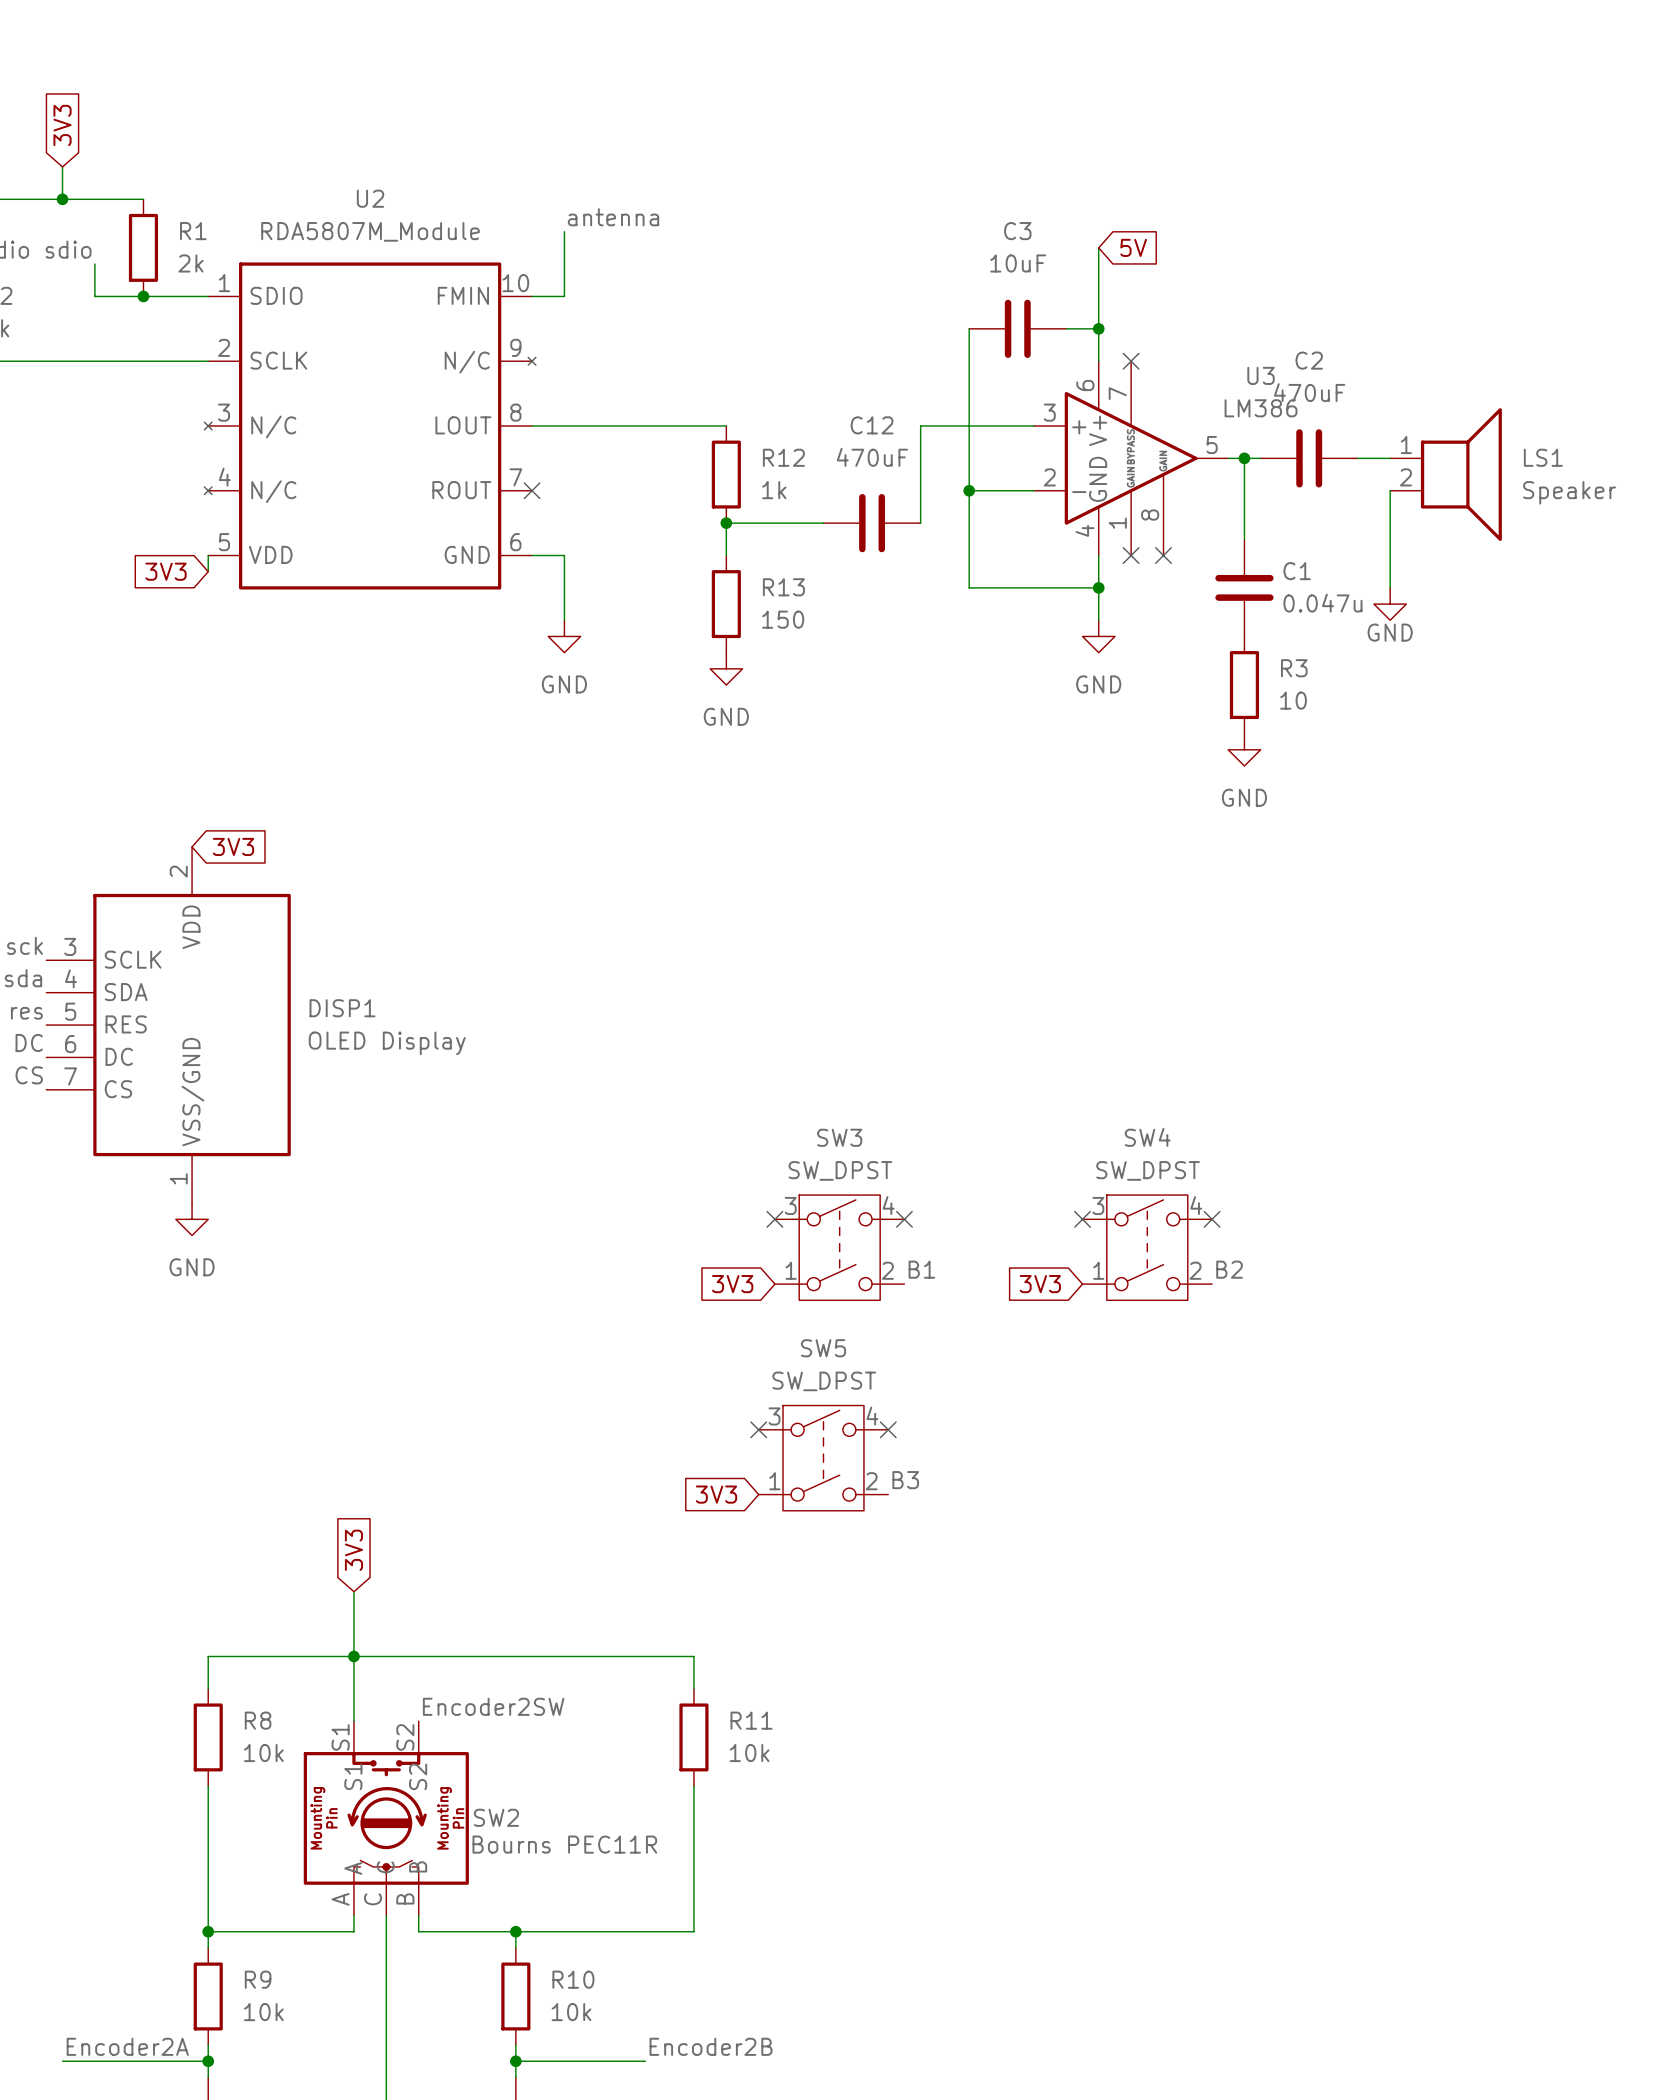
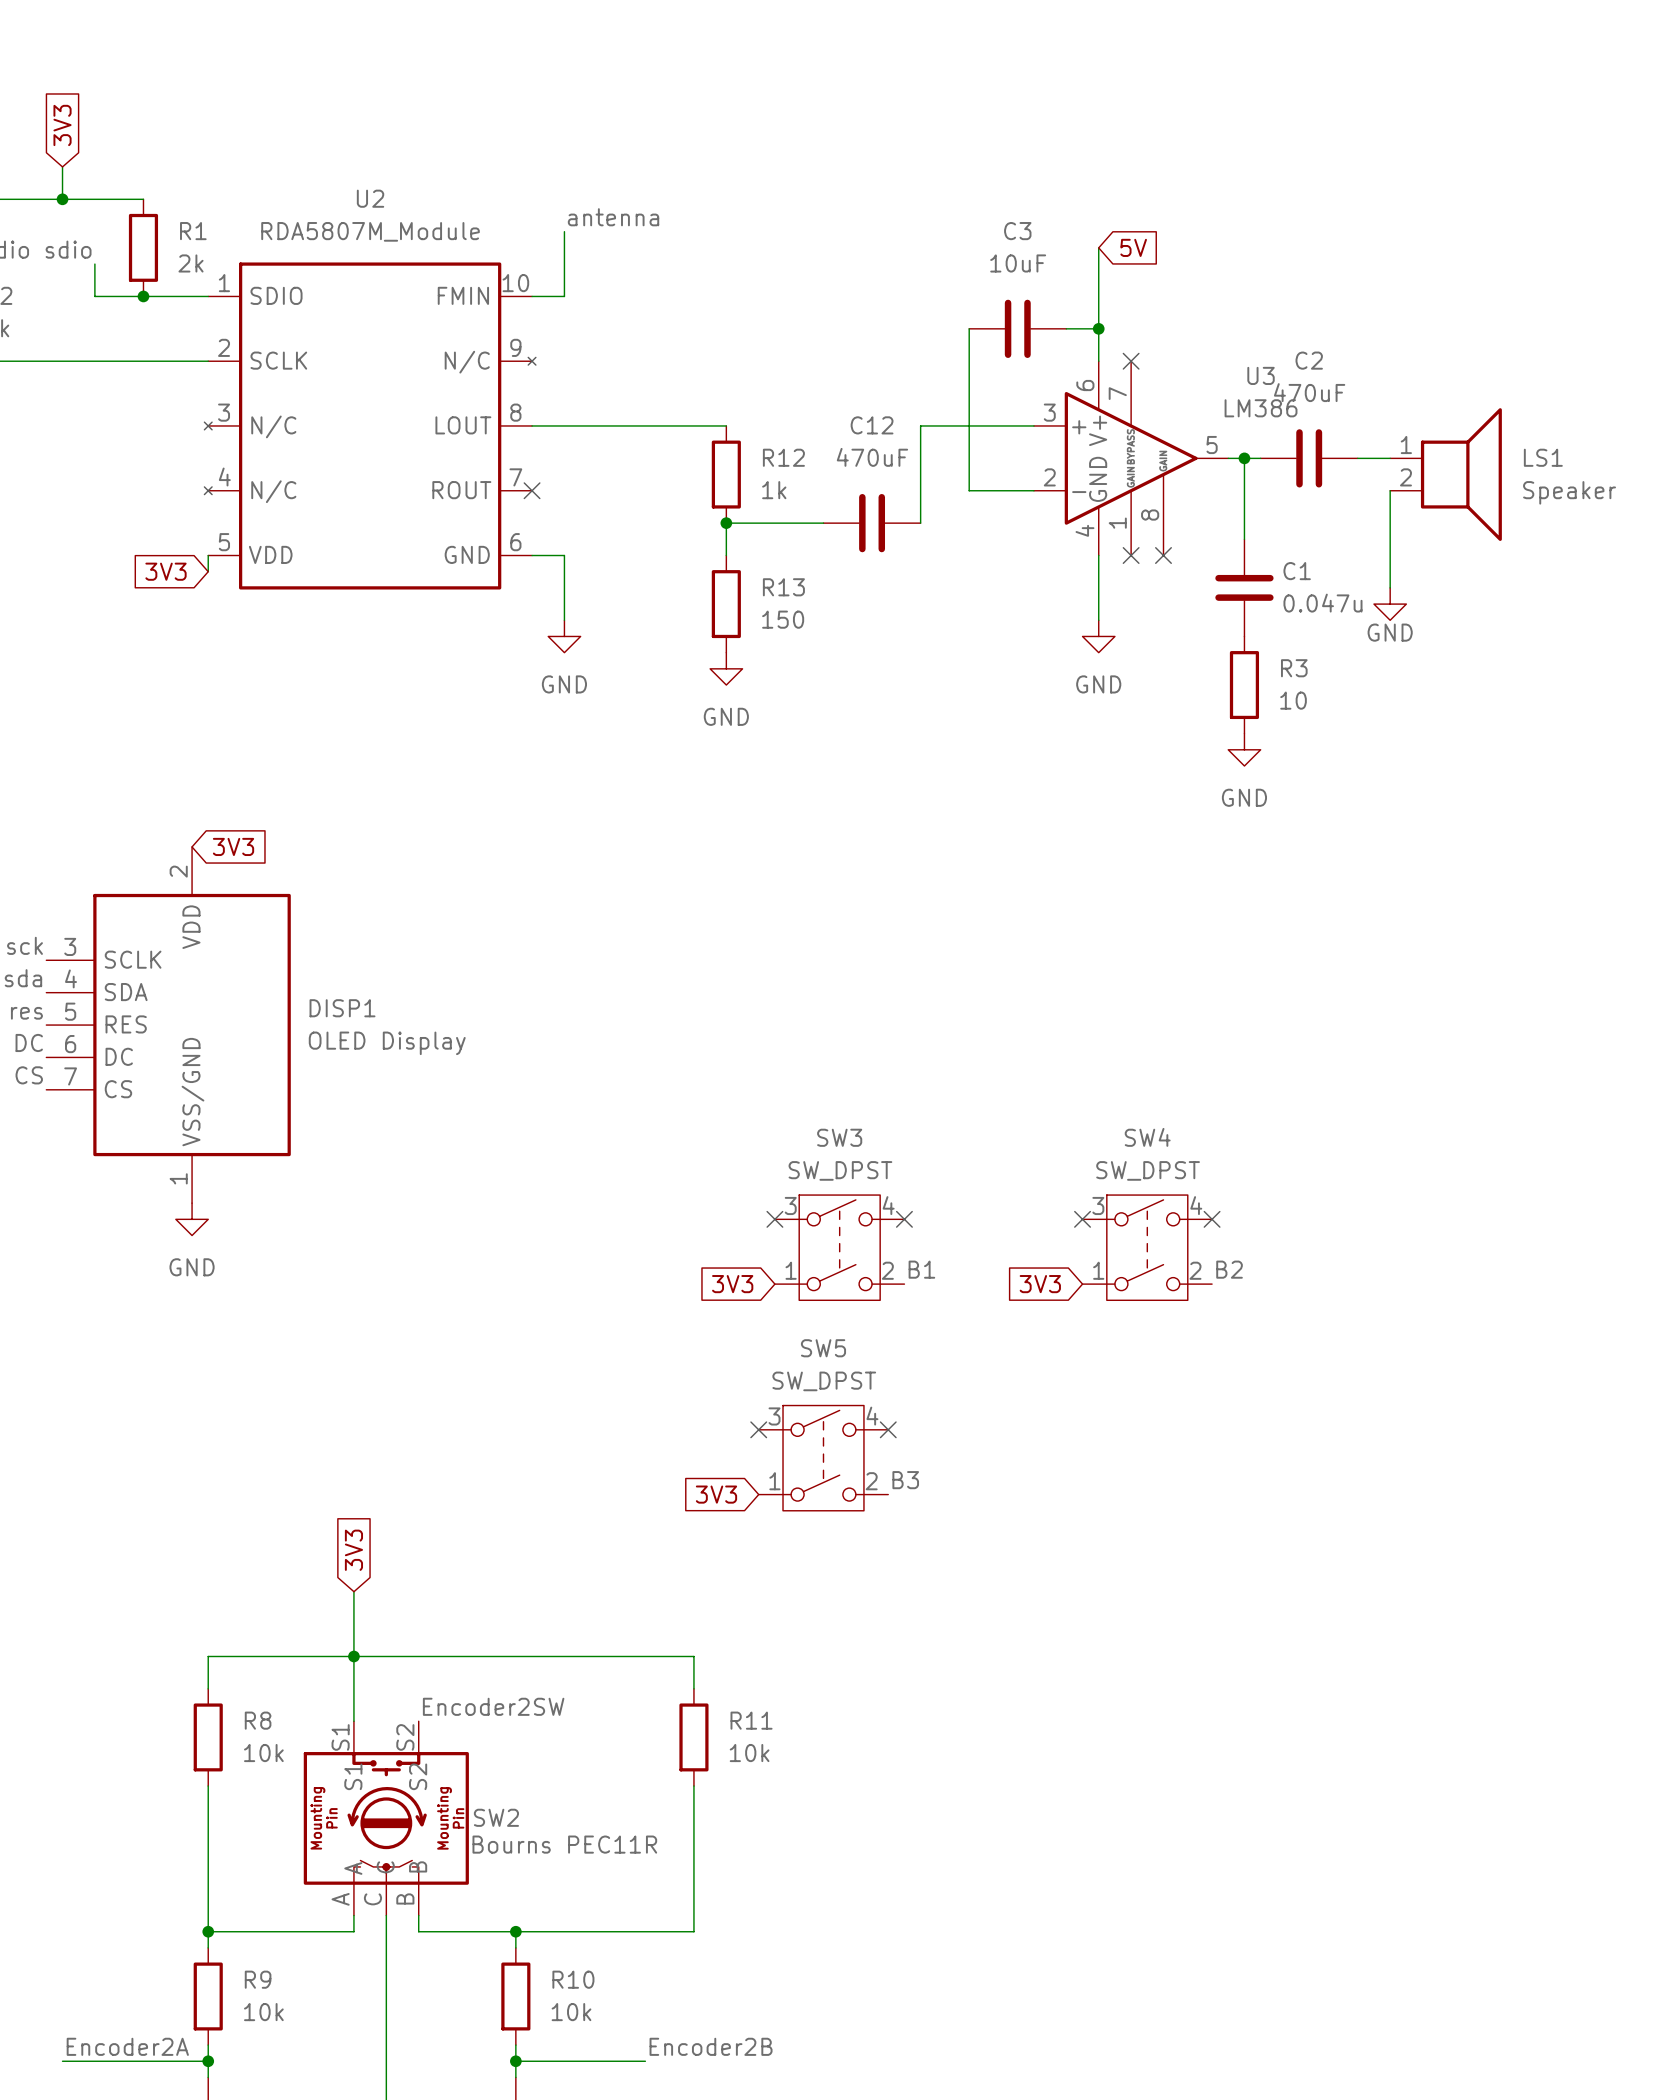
wire: (969, 490) (969, 587) (1098, 587) -> none
junction: (969, 490) -> none
junction: (1098, 587) -> none

